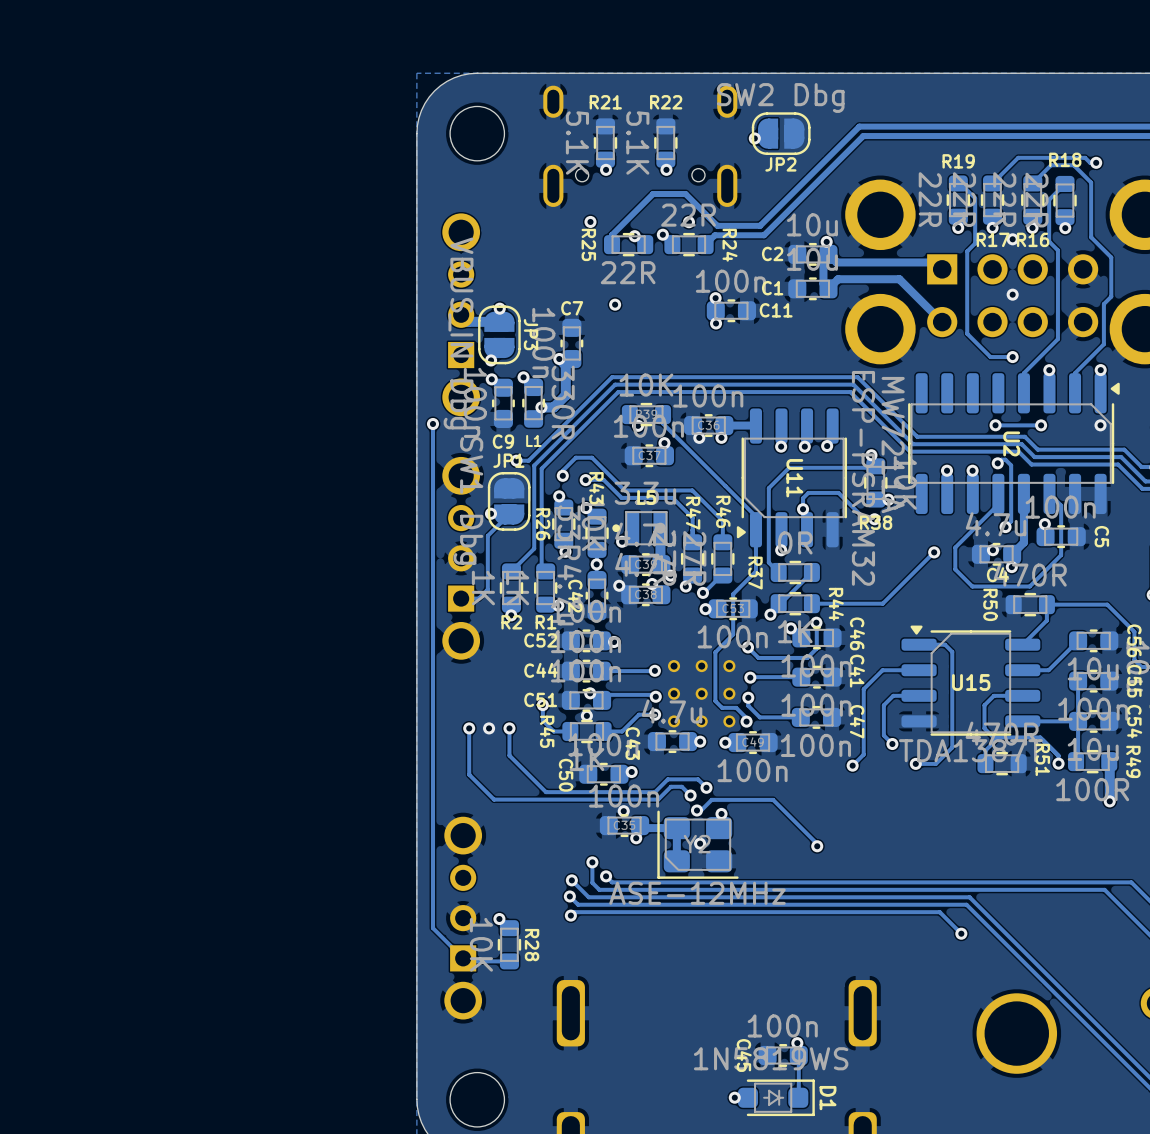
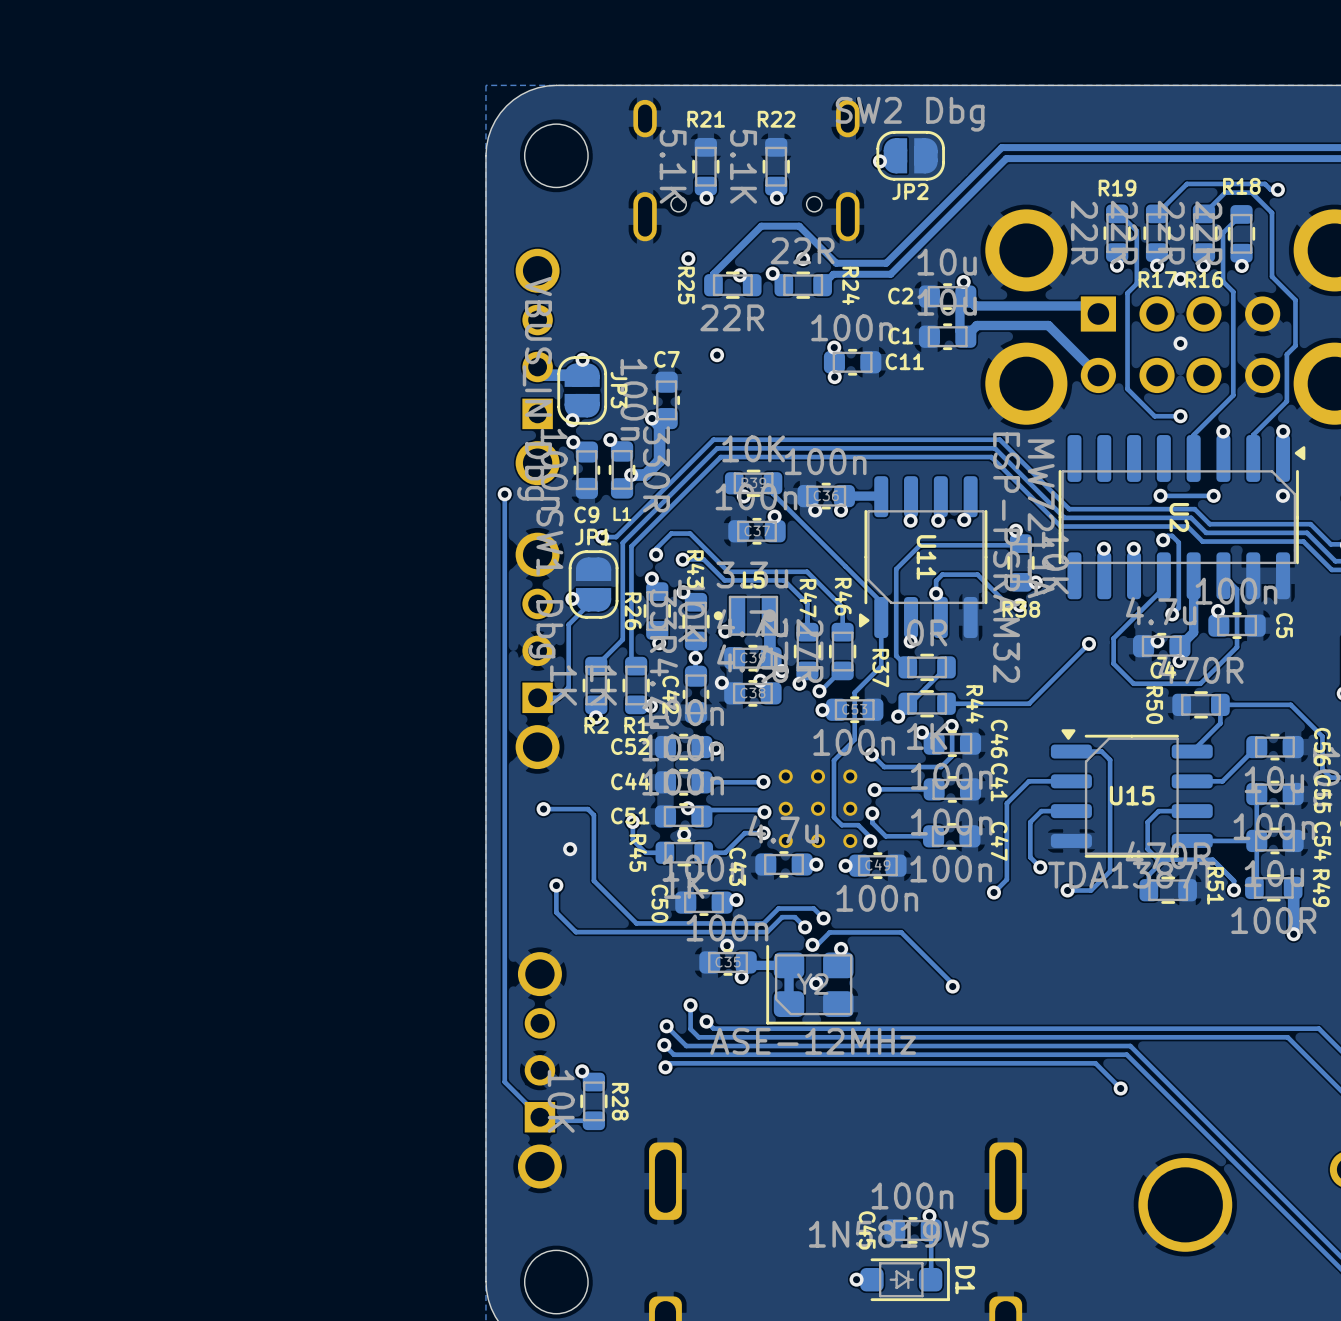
track: none -> (543, 809) (587, 809) (593, 815) (593, 849)
via: none -> (543, 809)
track: (469, 728) (469, 774) (477, 782) -> (556, 885) (556, 912)
via: (469, 728) -> none
via: (509, 728) -> none
via: none -> (556, 885)

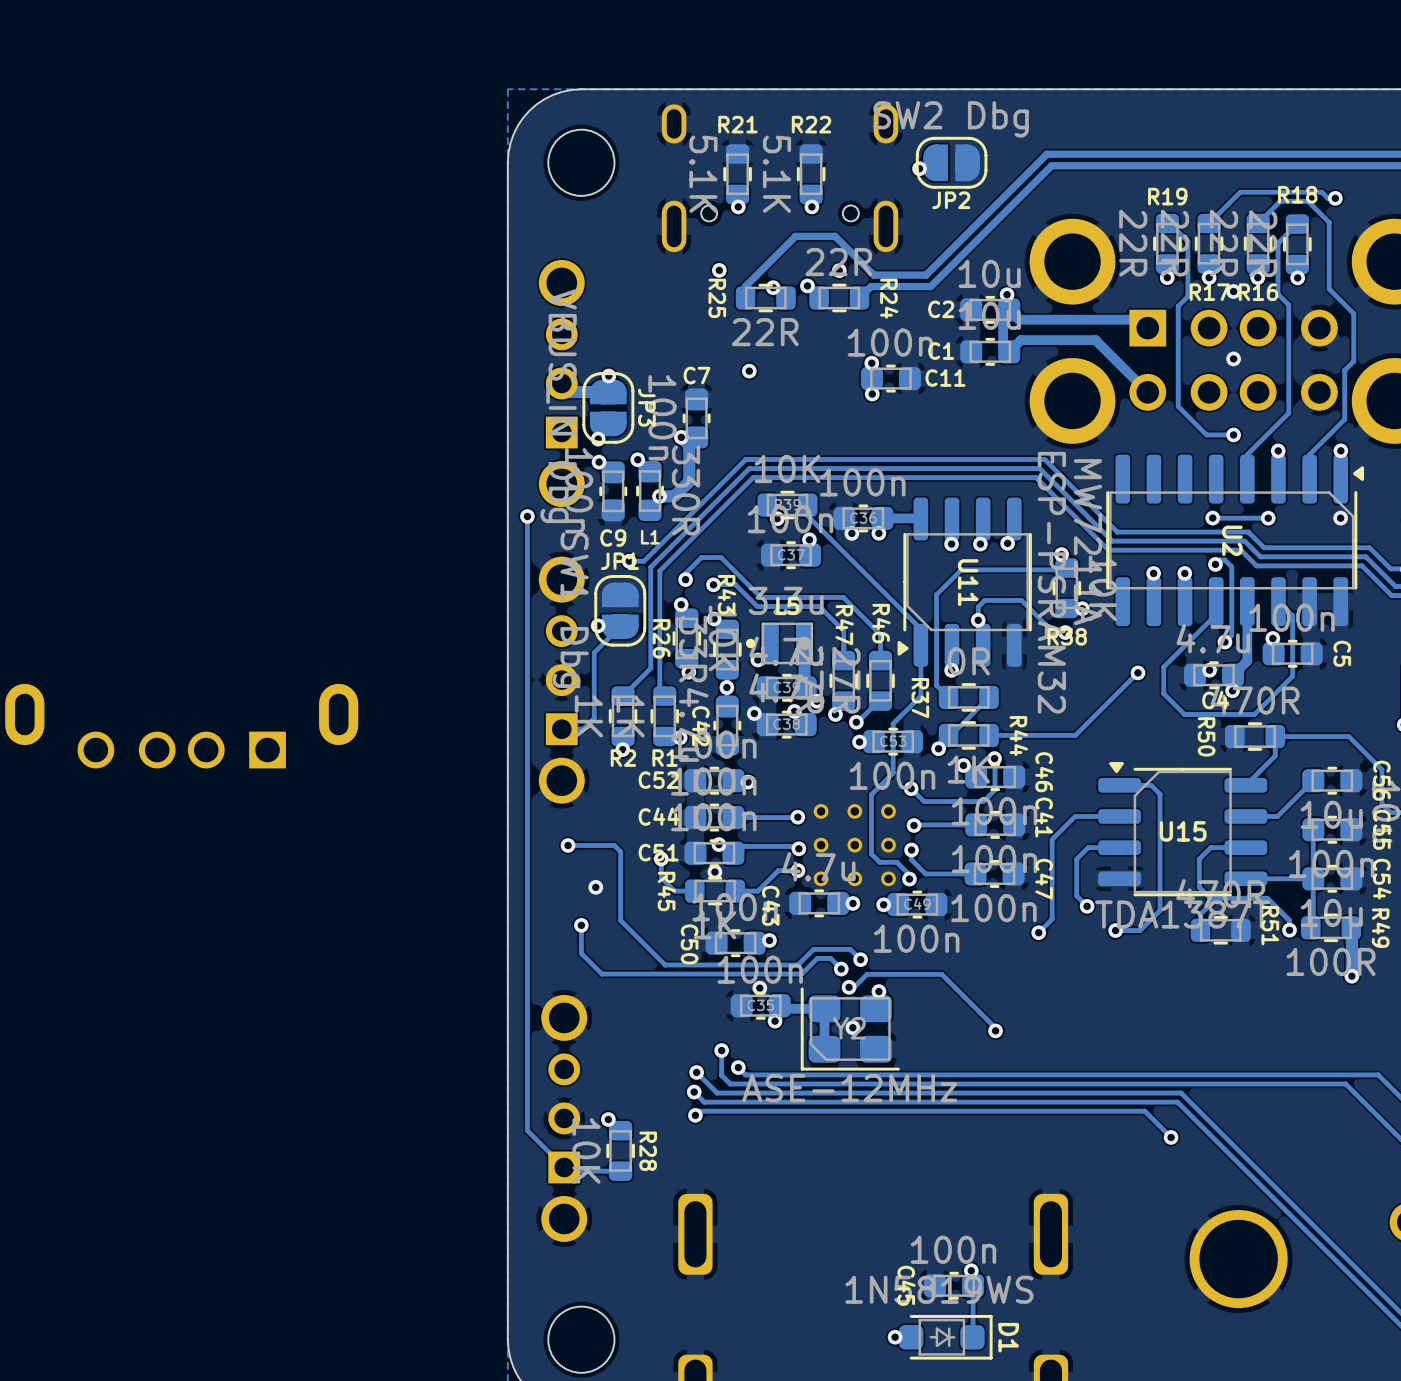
part: none -> (181, 726)

